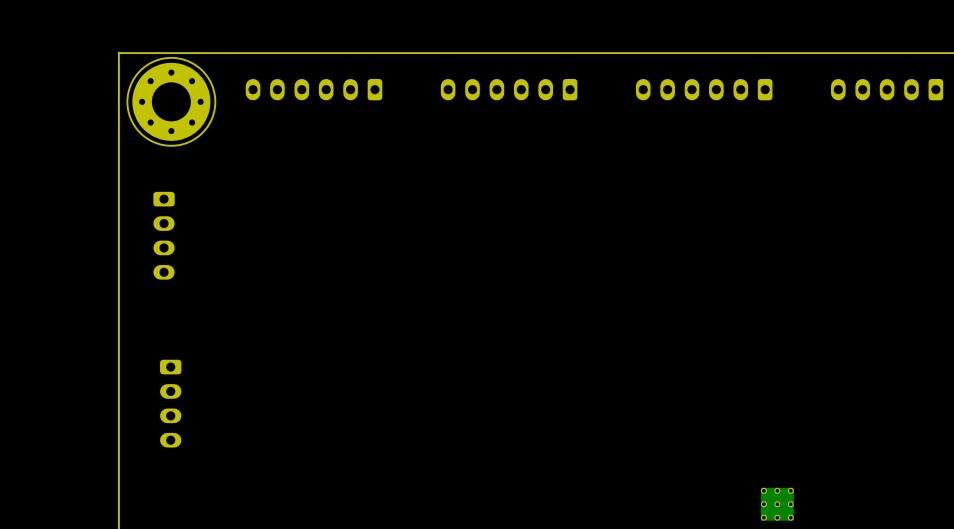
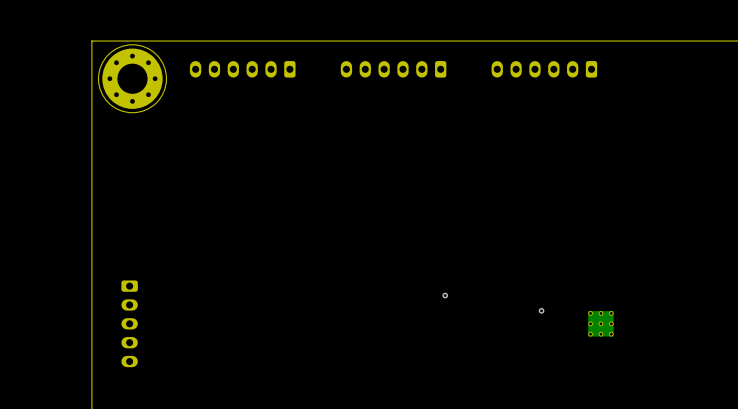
part: (887, 89) -> none
part: (164, 235) -> none
via: none -> (445, 295)
via: none -> (541, 310)
part: (170, 403) -> none
part: none -> (129, 323)
part position: (777, 504) -> (600, 323)

